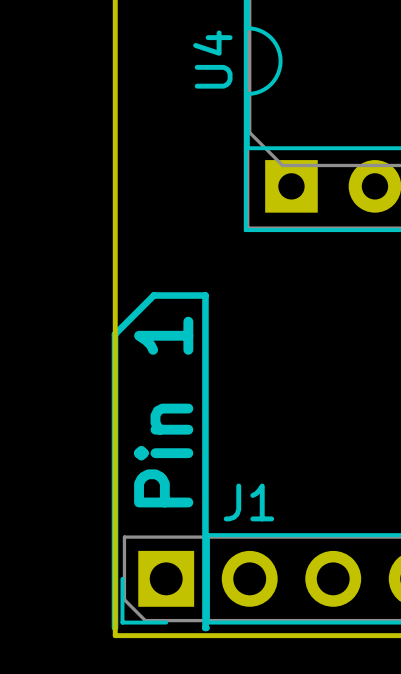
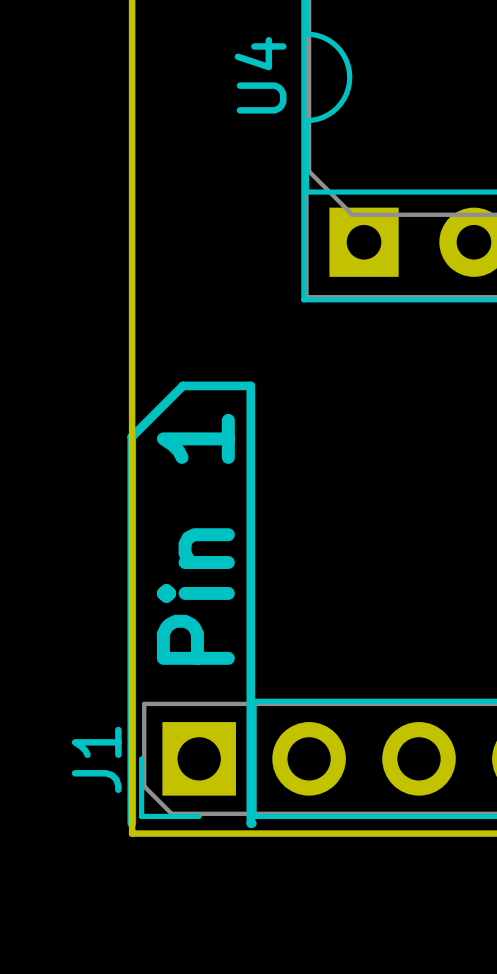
J1 name rotation: 0° (248, 502) -> 90° counterclockwise (96, 759)
J1 name position: J1 (248, 502) -> J1 (96, 759)

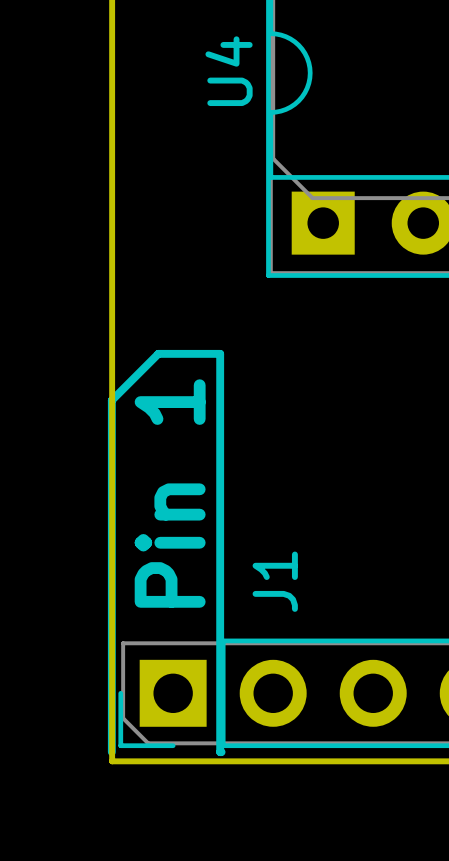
J1 name position: J1 (96, 759) -> J1 (275, 581)

